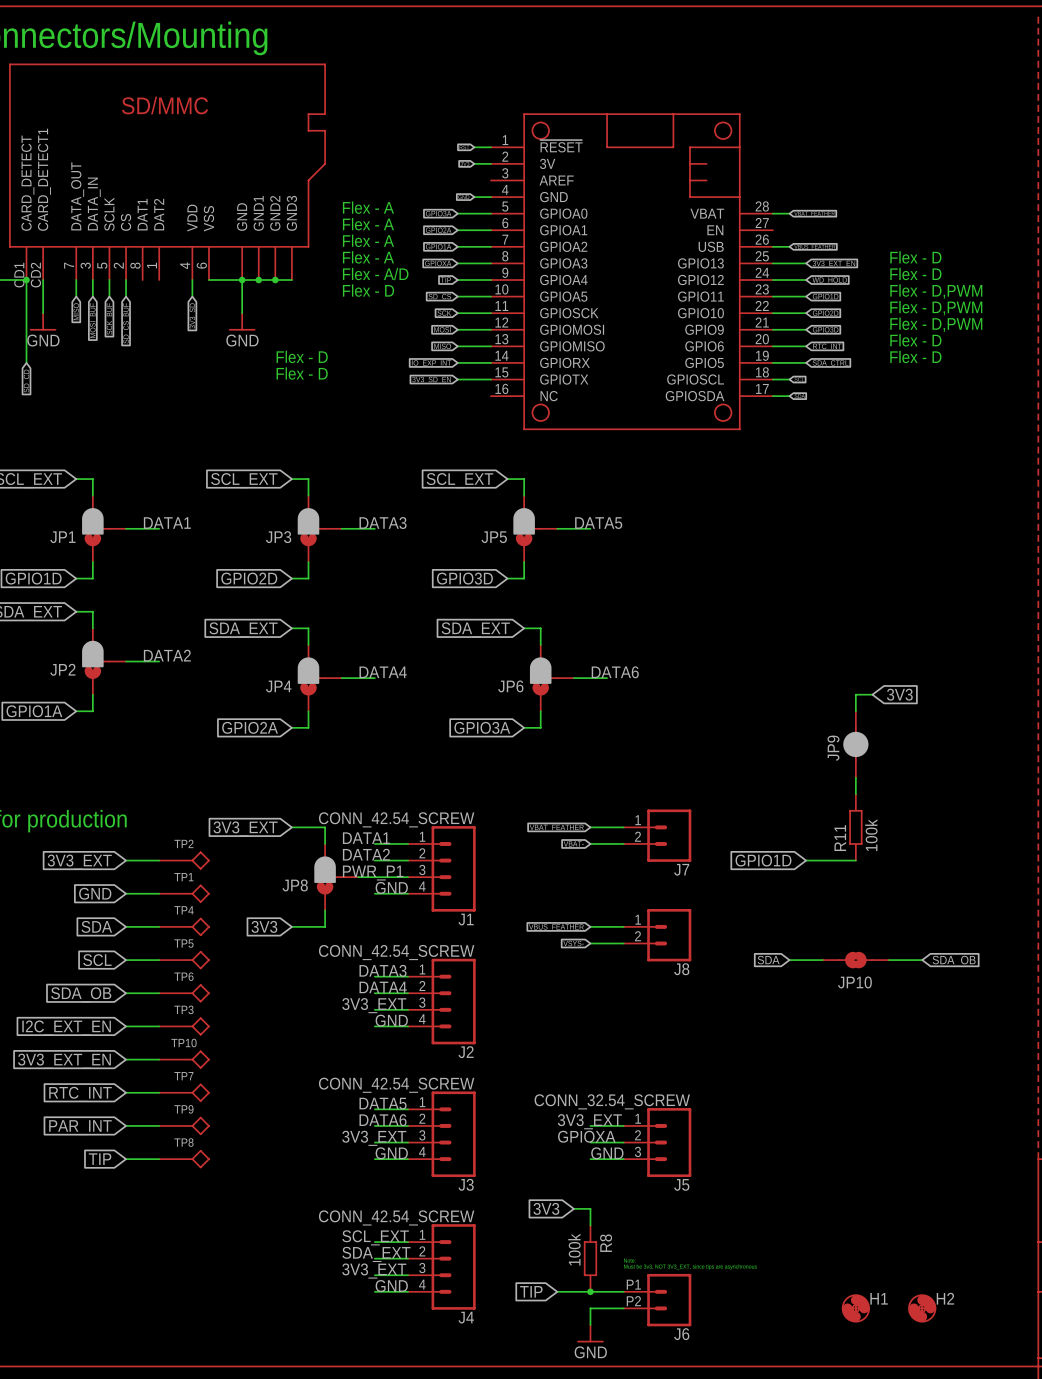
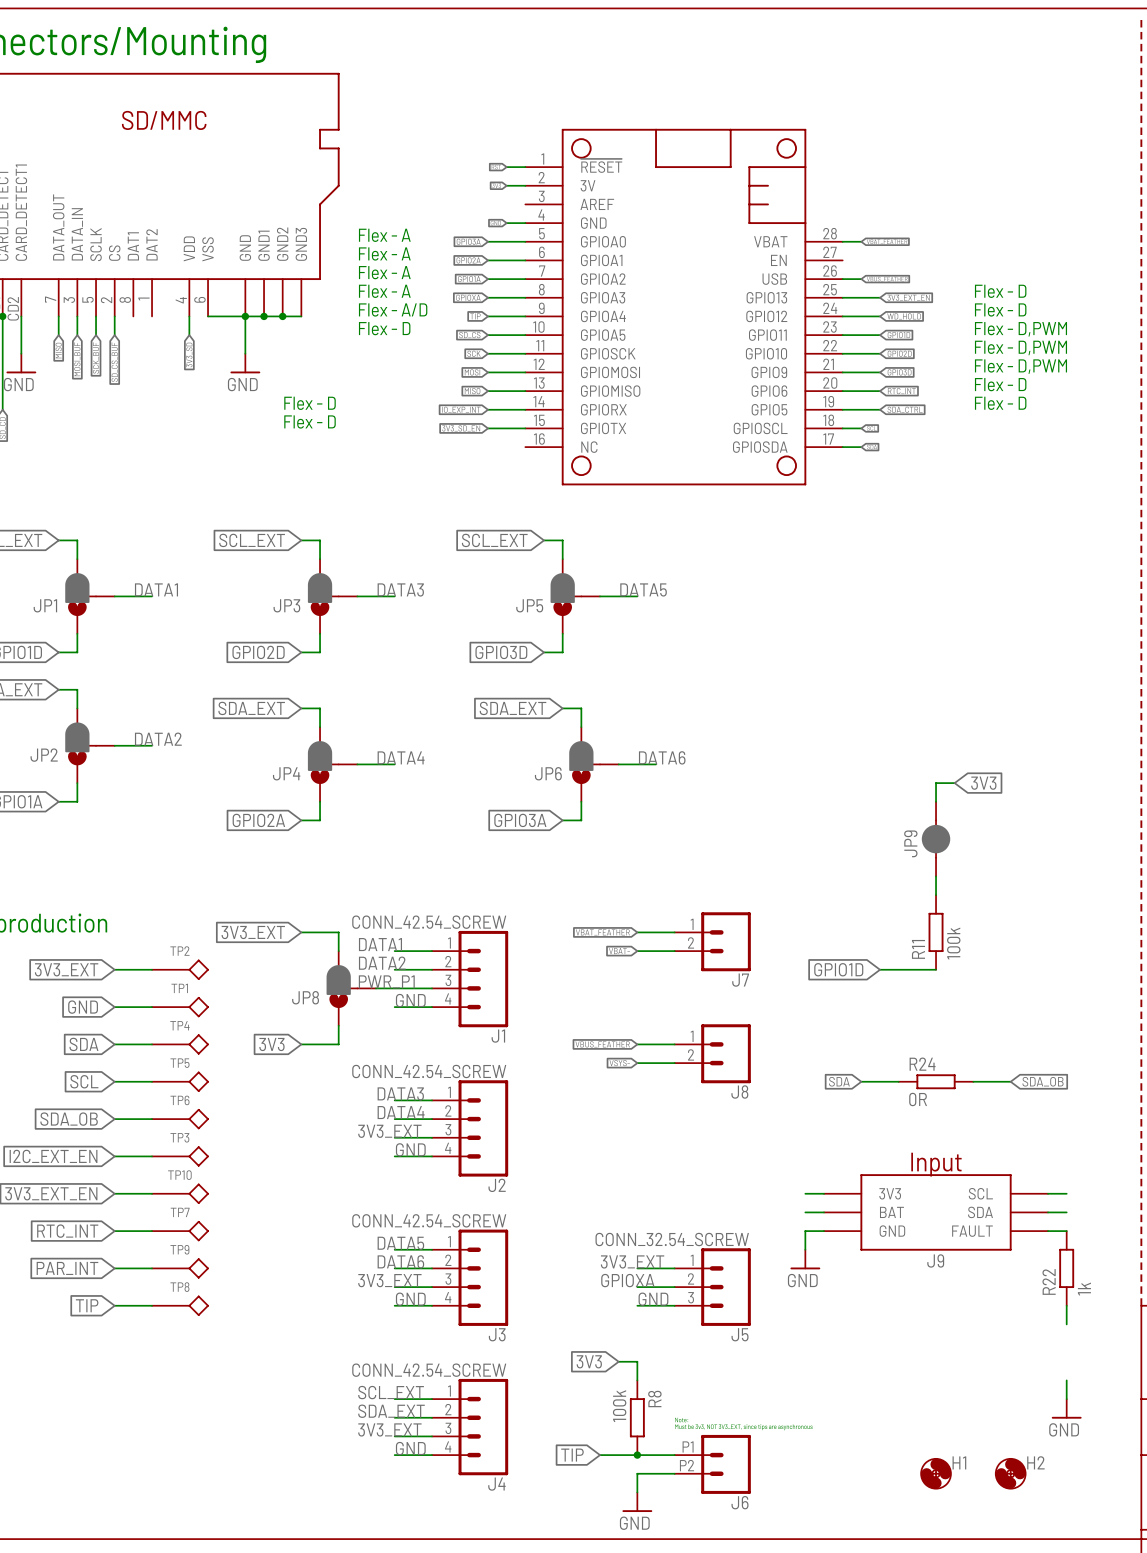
JP10: (855, 960) -> none
R24: none -> 0R (936, 1081)
wire: none -> (805, 1193) (824, 1193)
wire: none -> (1048, 1193) (1066, 1193)
wire: none -> (805, 1212) (824, 1212)
J9: none -> (936, 1212)
wire: none -> (1048, 1212) (1066, 1212)
wire: none -> (824, 1231) (805, 1231) (805, 1249)
wire: none -> (1048, 1231) (1066, 1231)
power symbol: none -> GND (805, 1259)
R22: none -> 1k (1066, 1268)
wire: none -> (1066, 1305) (1066, 1324)
wire: none -> (1066, 1380) (1066, 1399)
power symbol: none -> GND (1066, 1408)

